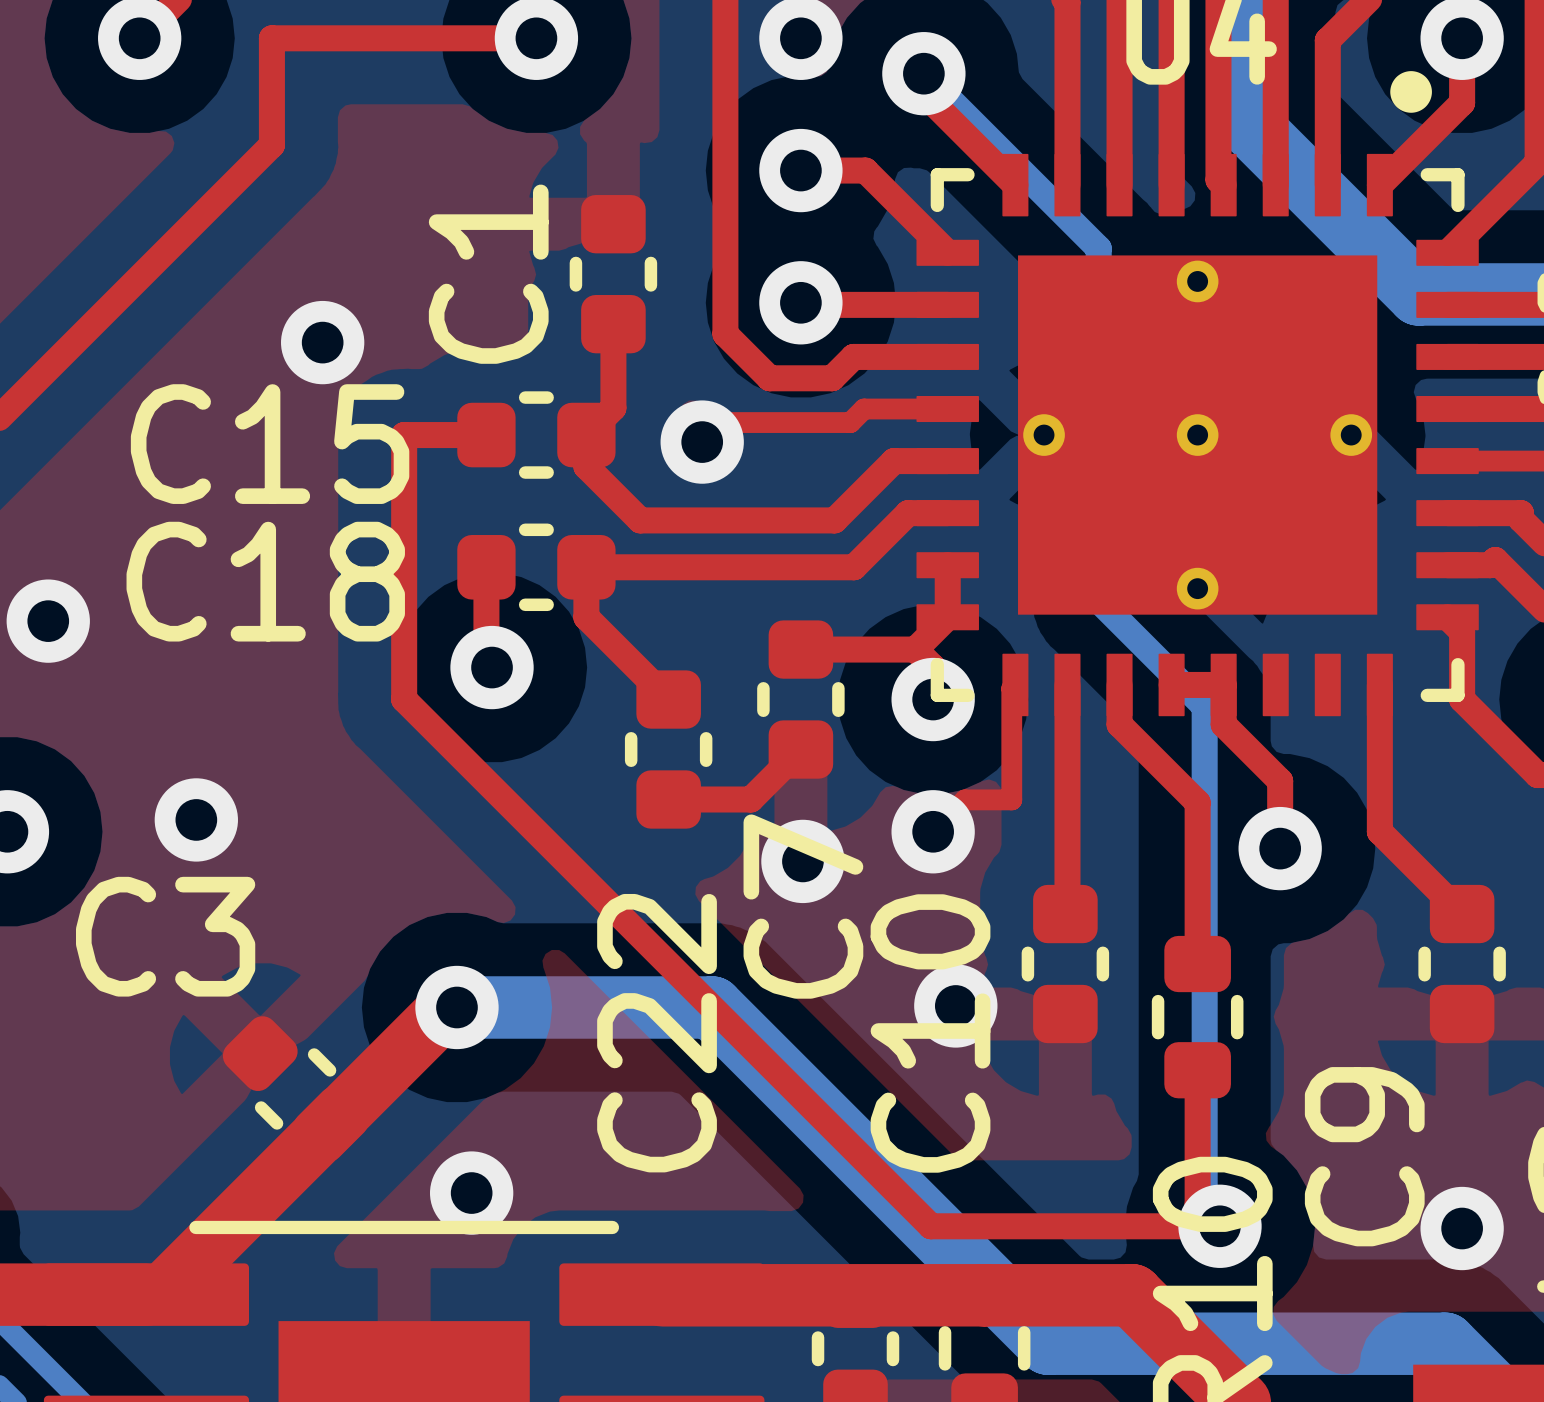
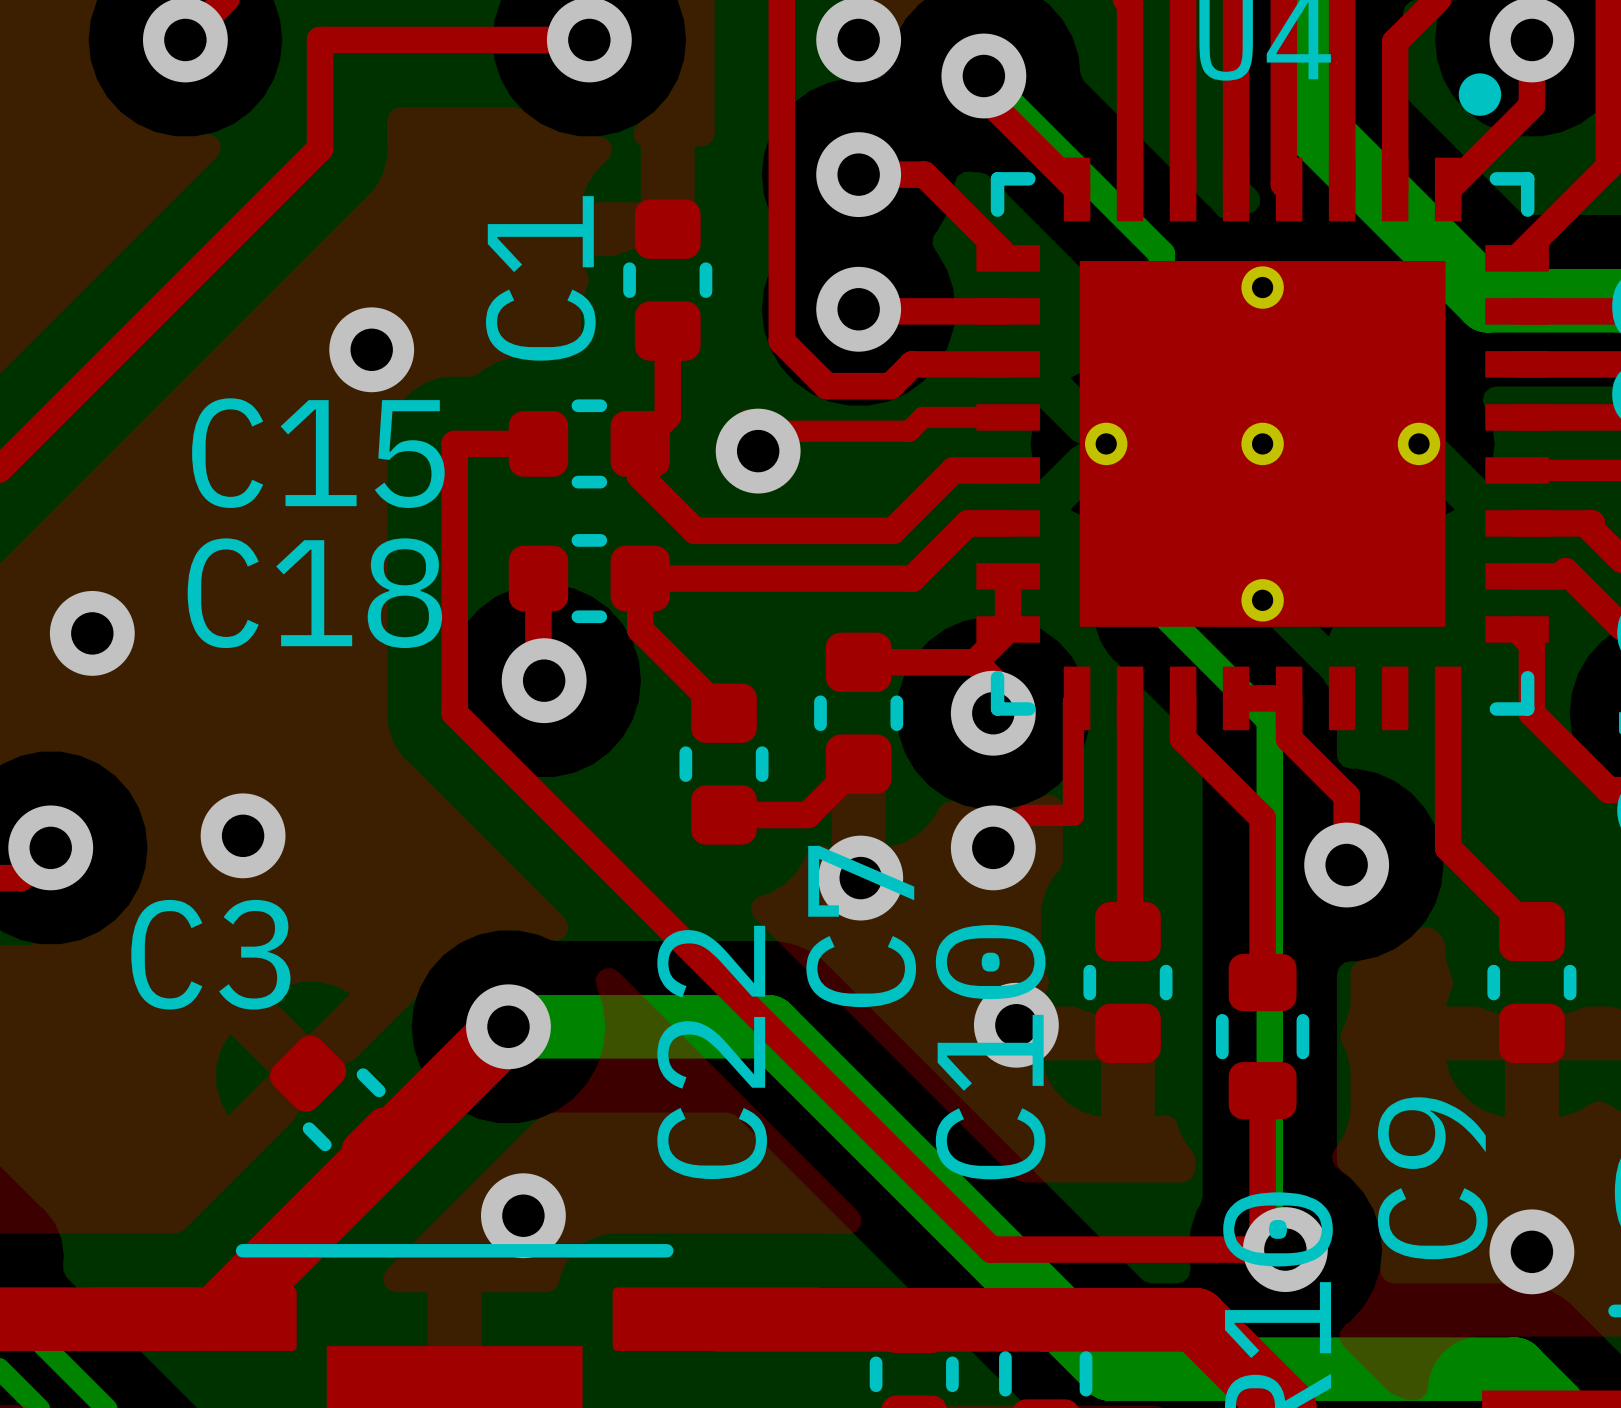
top track: (456, 1007) (447, 1007) (160, 1294) (146, 1294) -> (508, 1026) (216, 1319)

